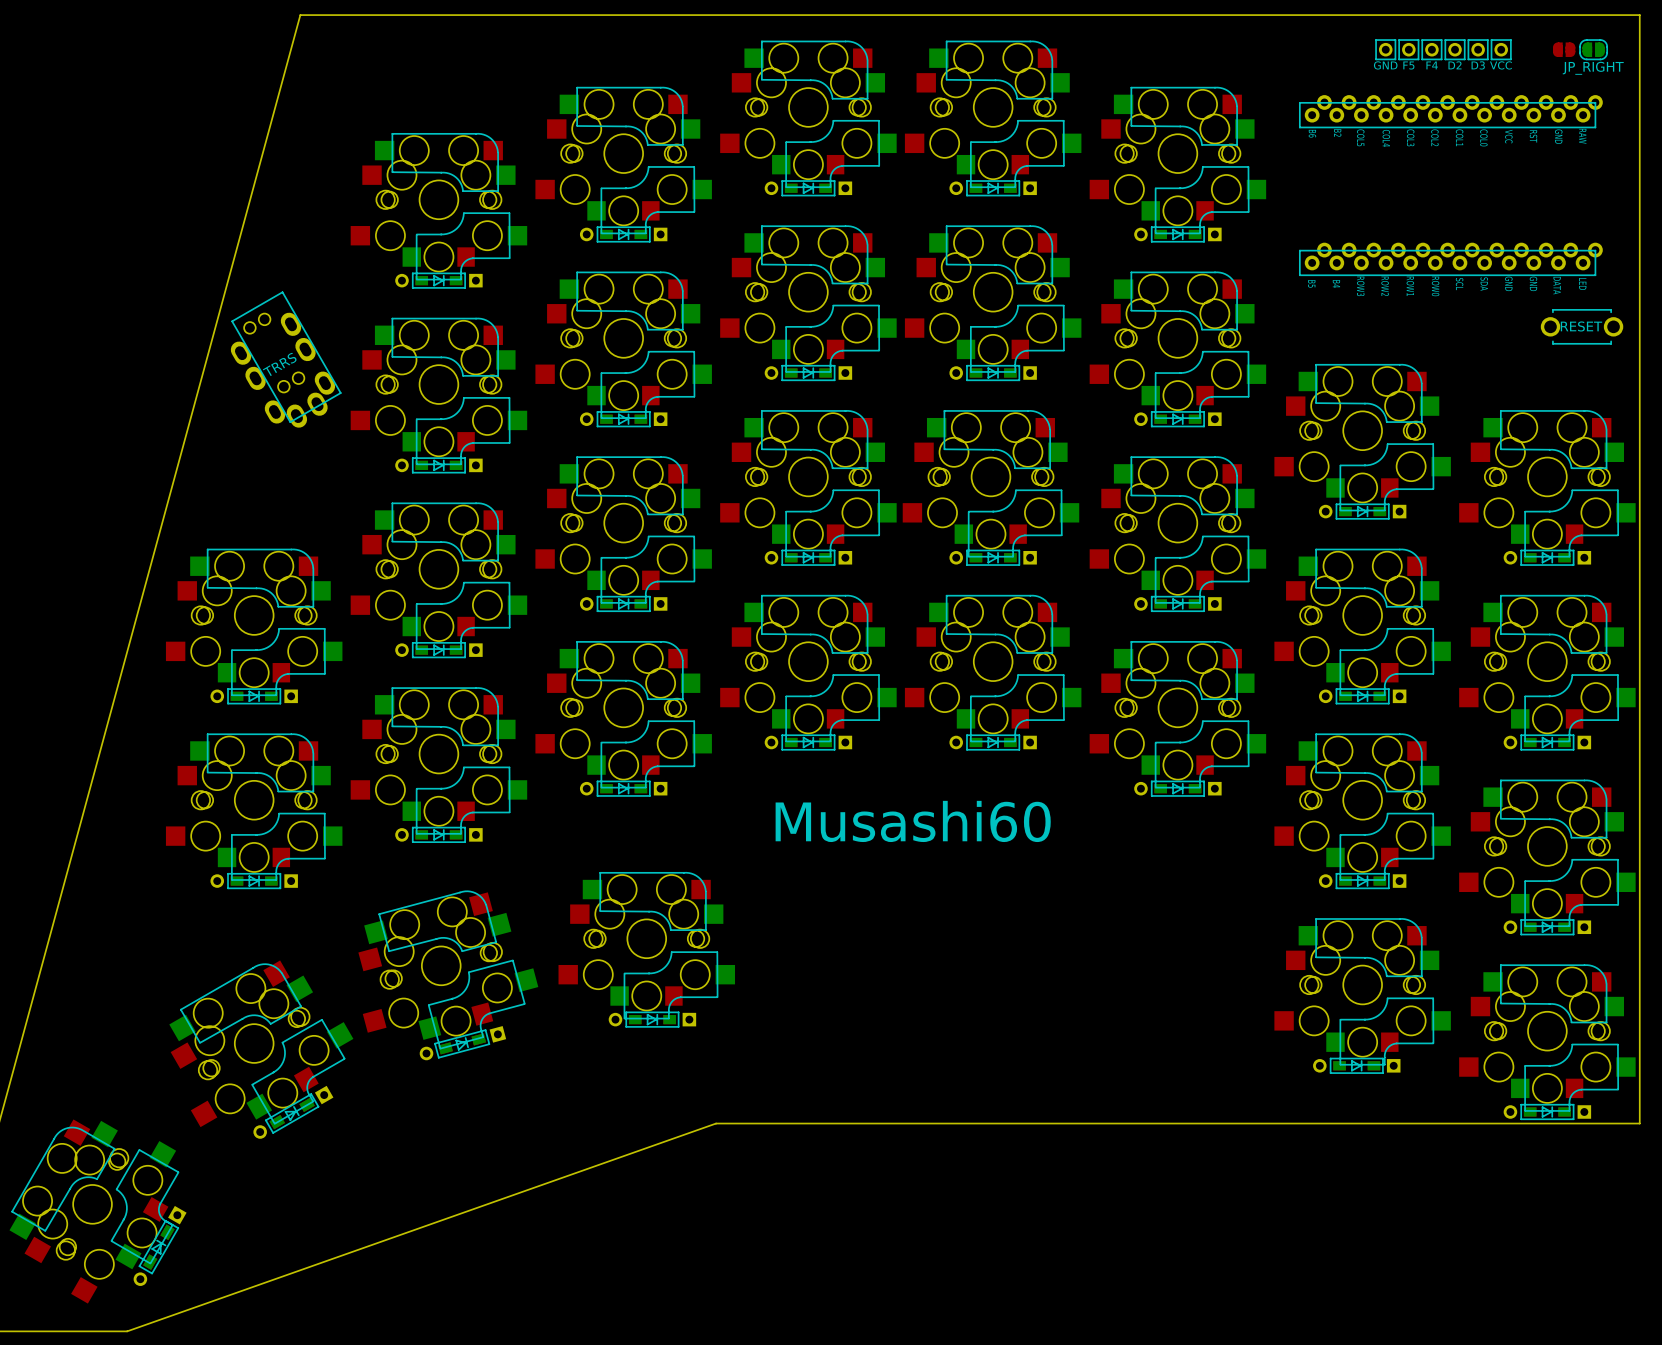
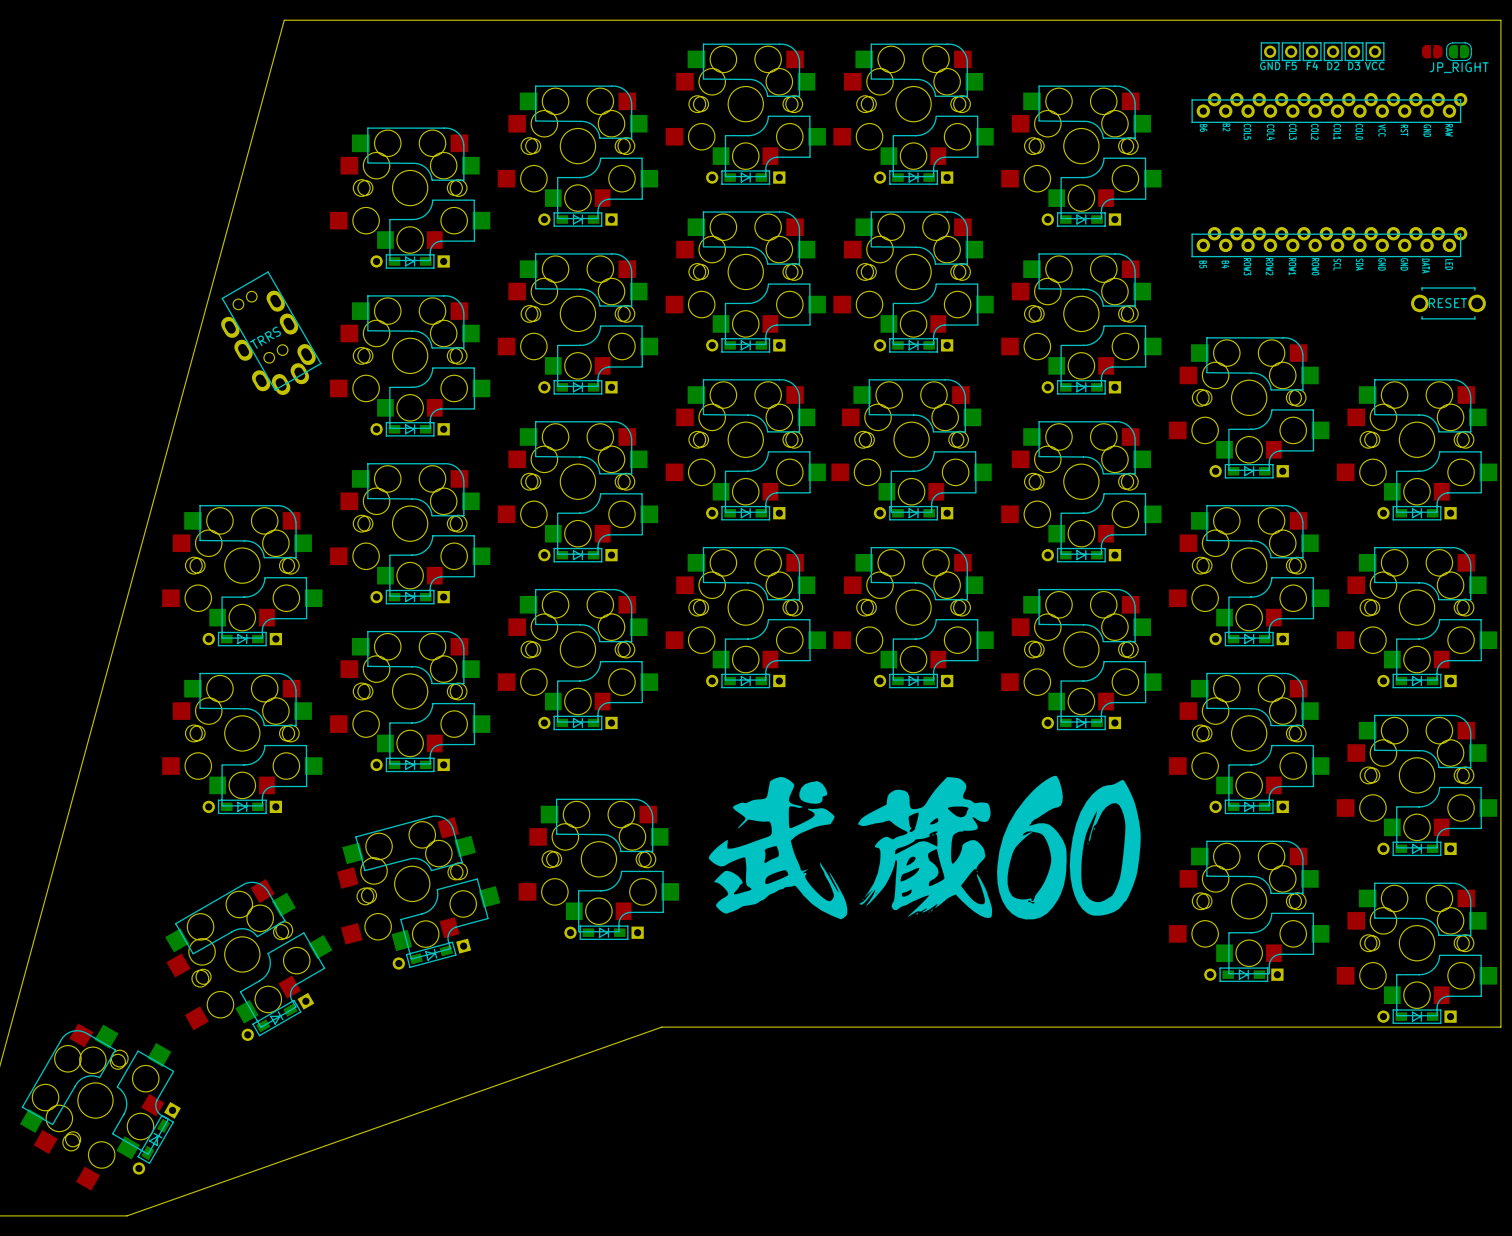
text: Musashi60 (913, 821) -> none
drawing: none -> [708, 775, 1141, 920]

